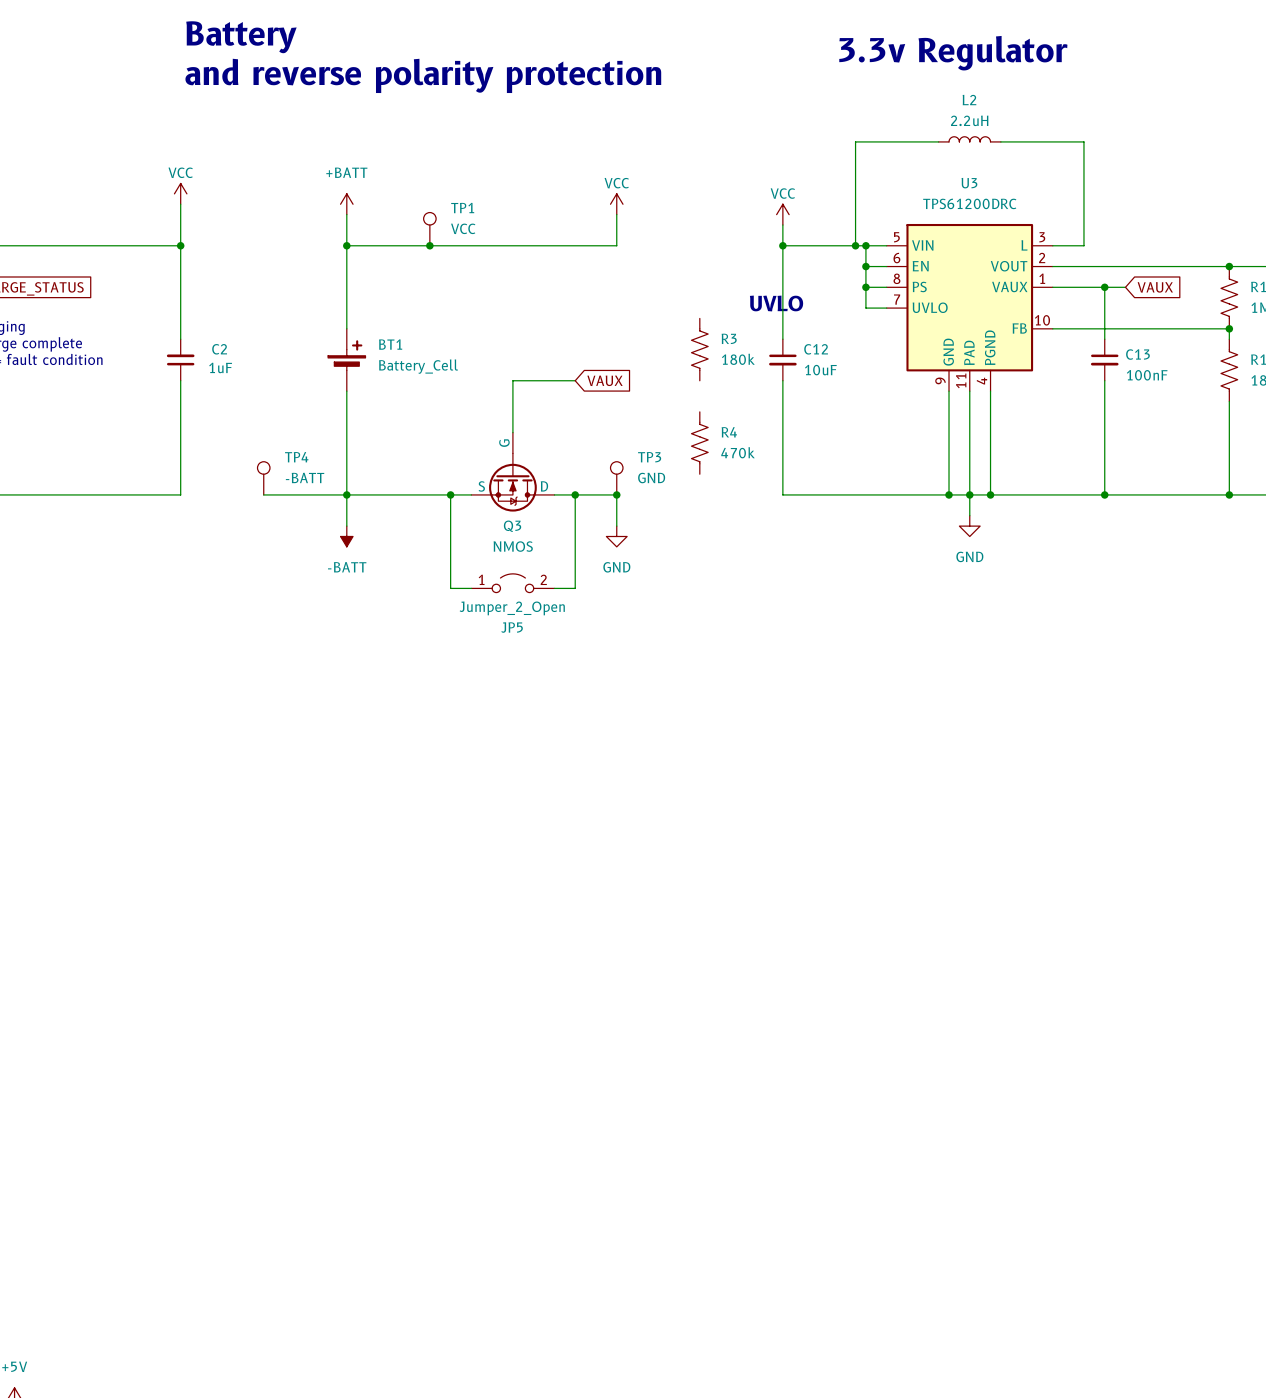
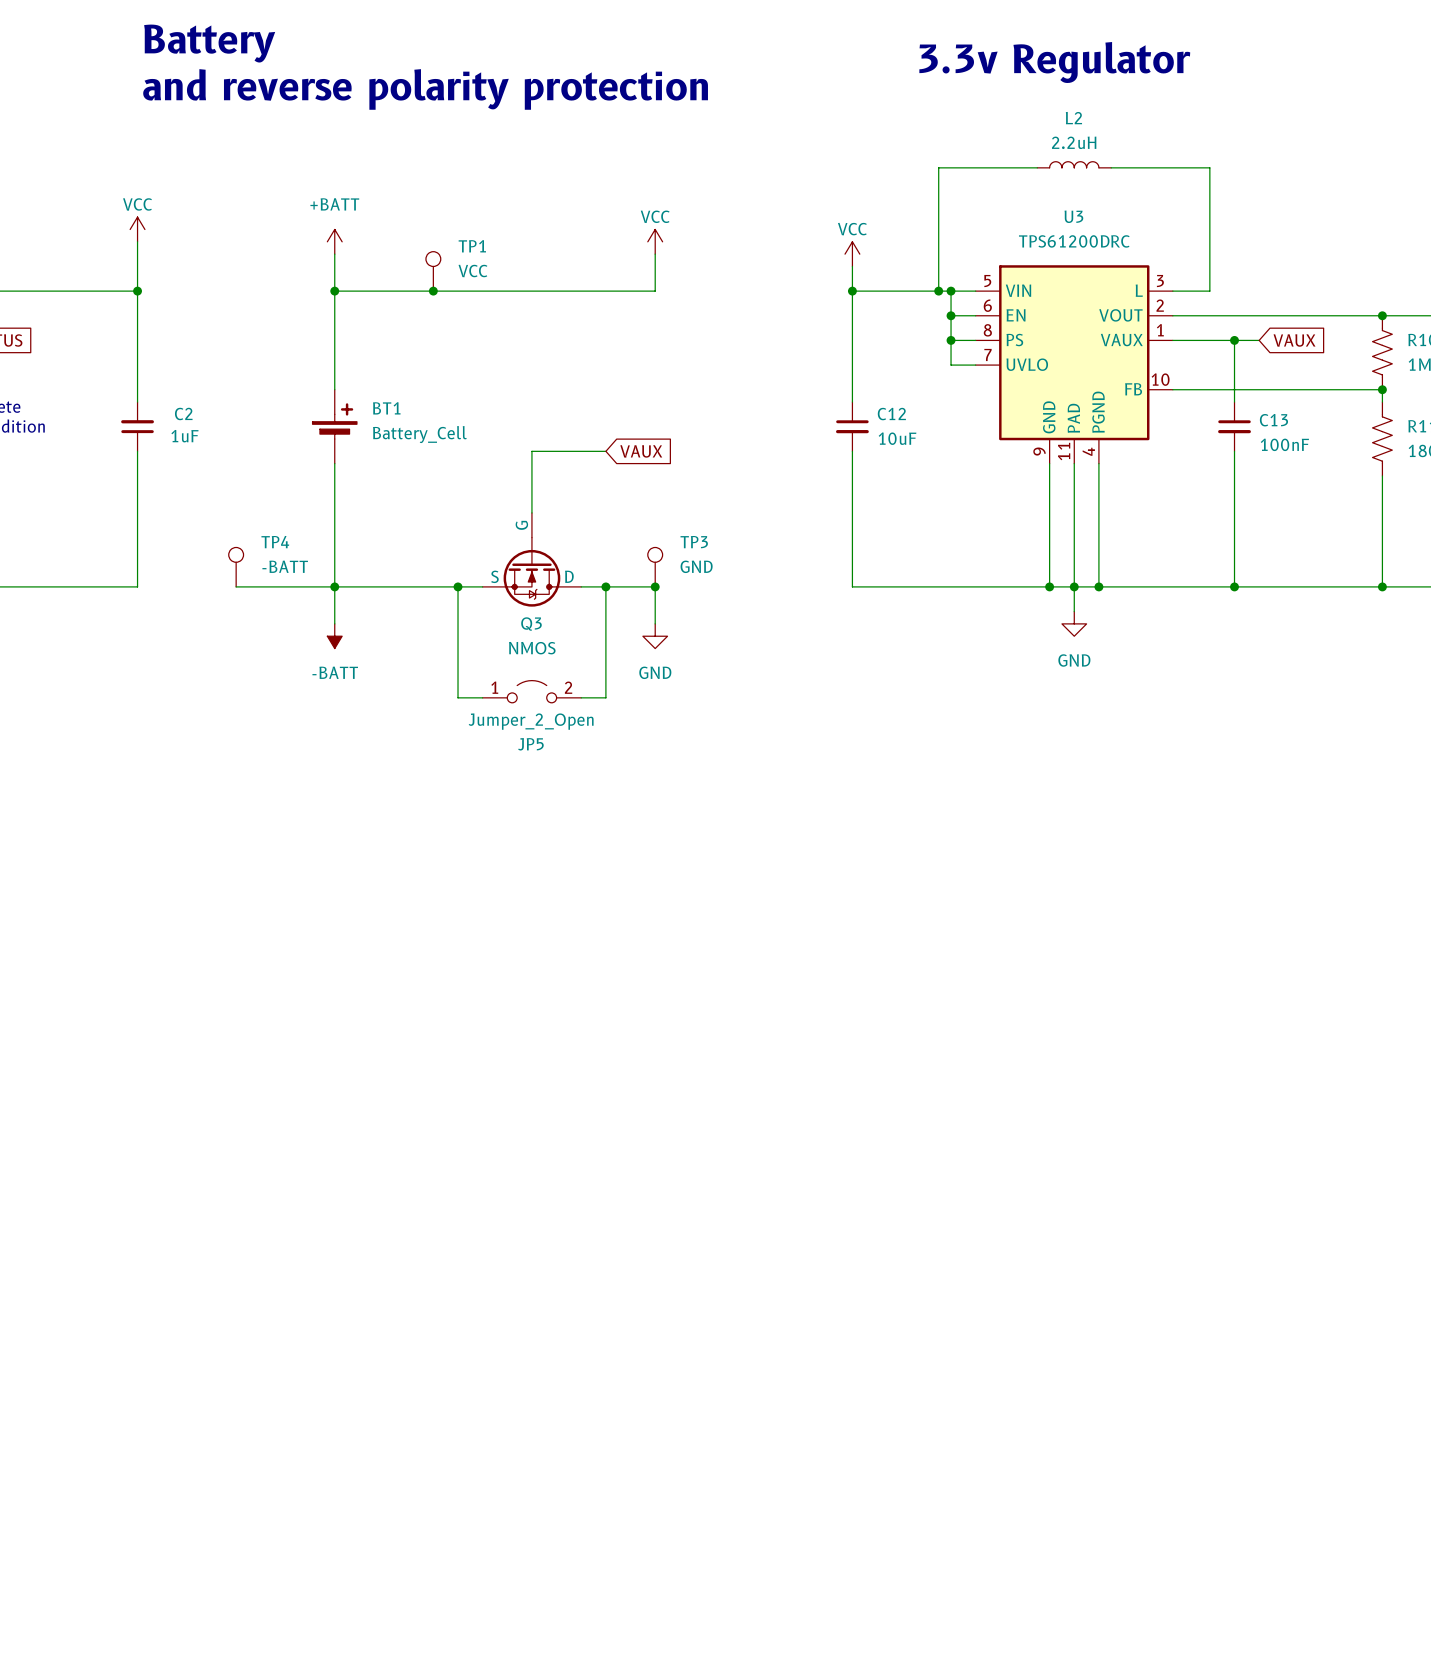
text: UVLO (776, 303) -> none
R3: 180k (699, 349) -> none
R4: 470k (699, 443) -> none

